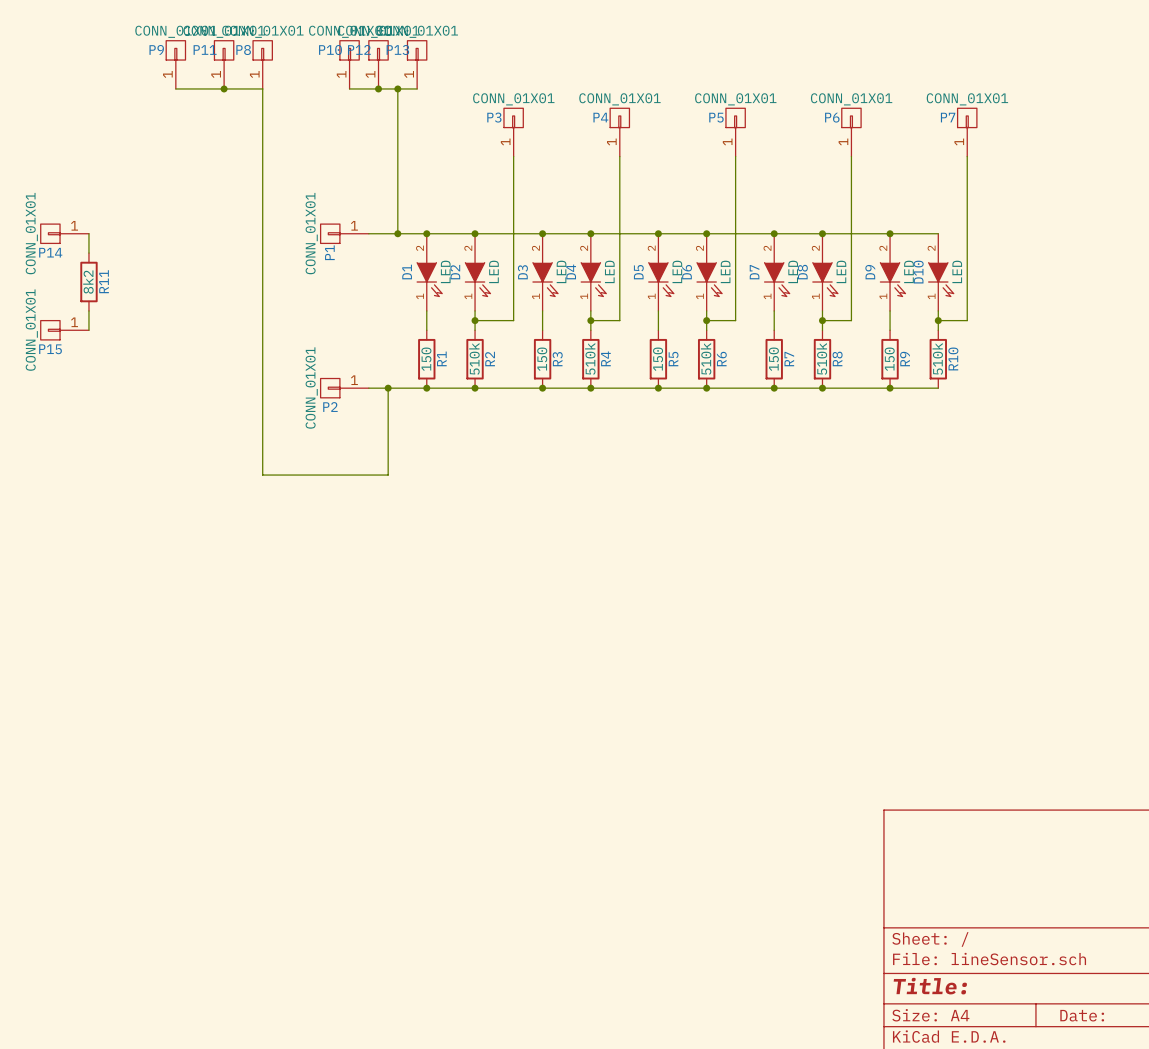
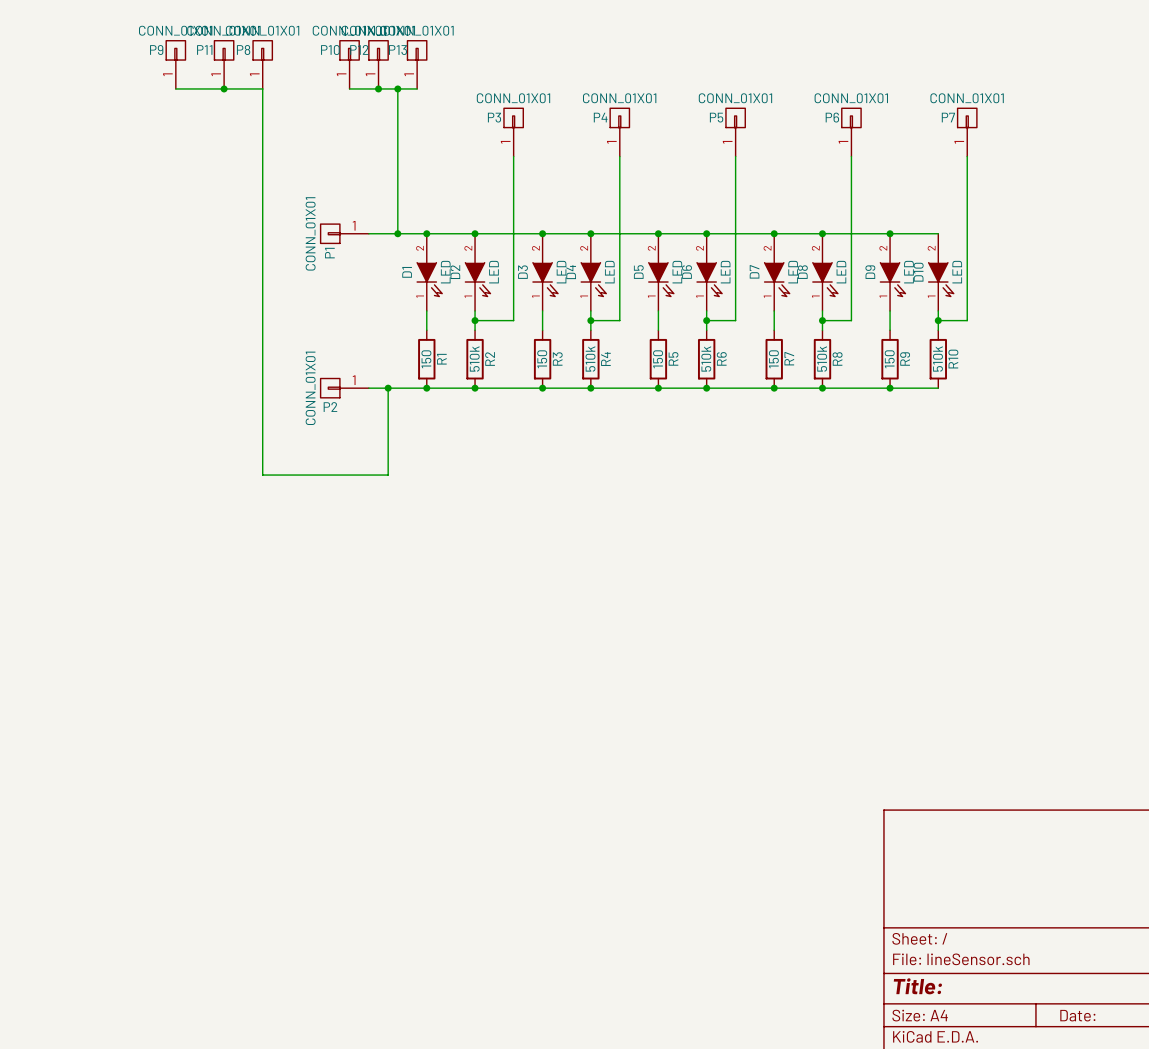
P14: CONN_01X01 (64, 233) -> none
wire: (88, 233) (88, 253) -> none
R11: 8k2 (88, 282) -> none
wire: (88, 310) (88, 330) -> none
P15: CONN_01X01 (64, 330) -> none

